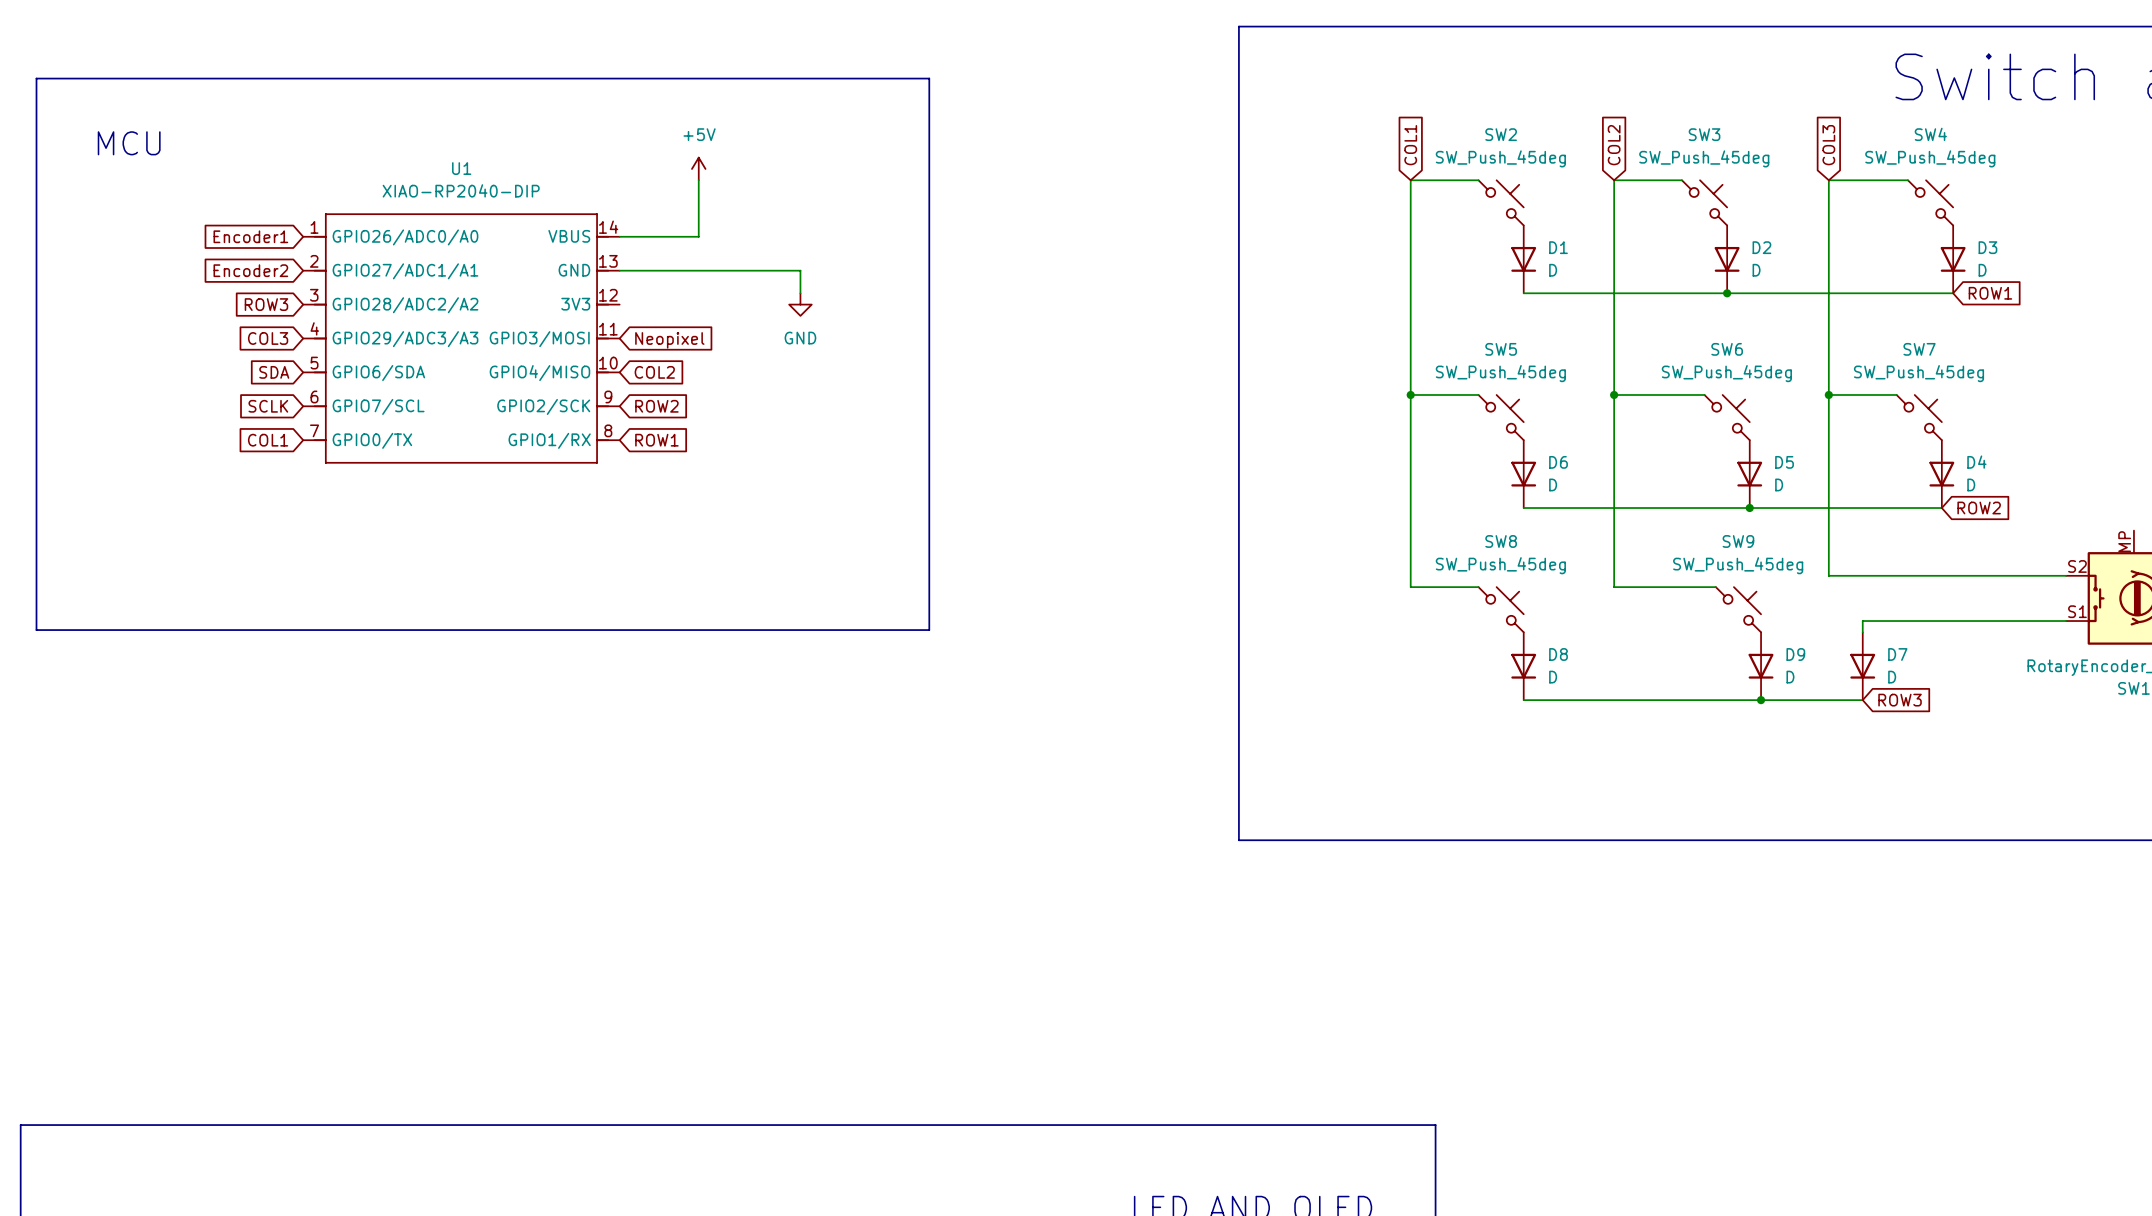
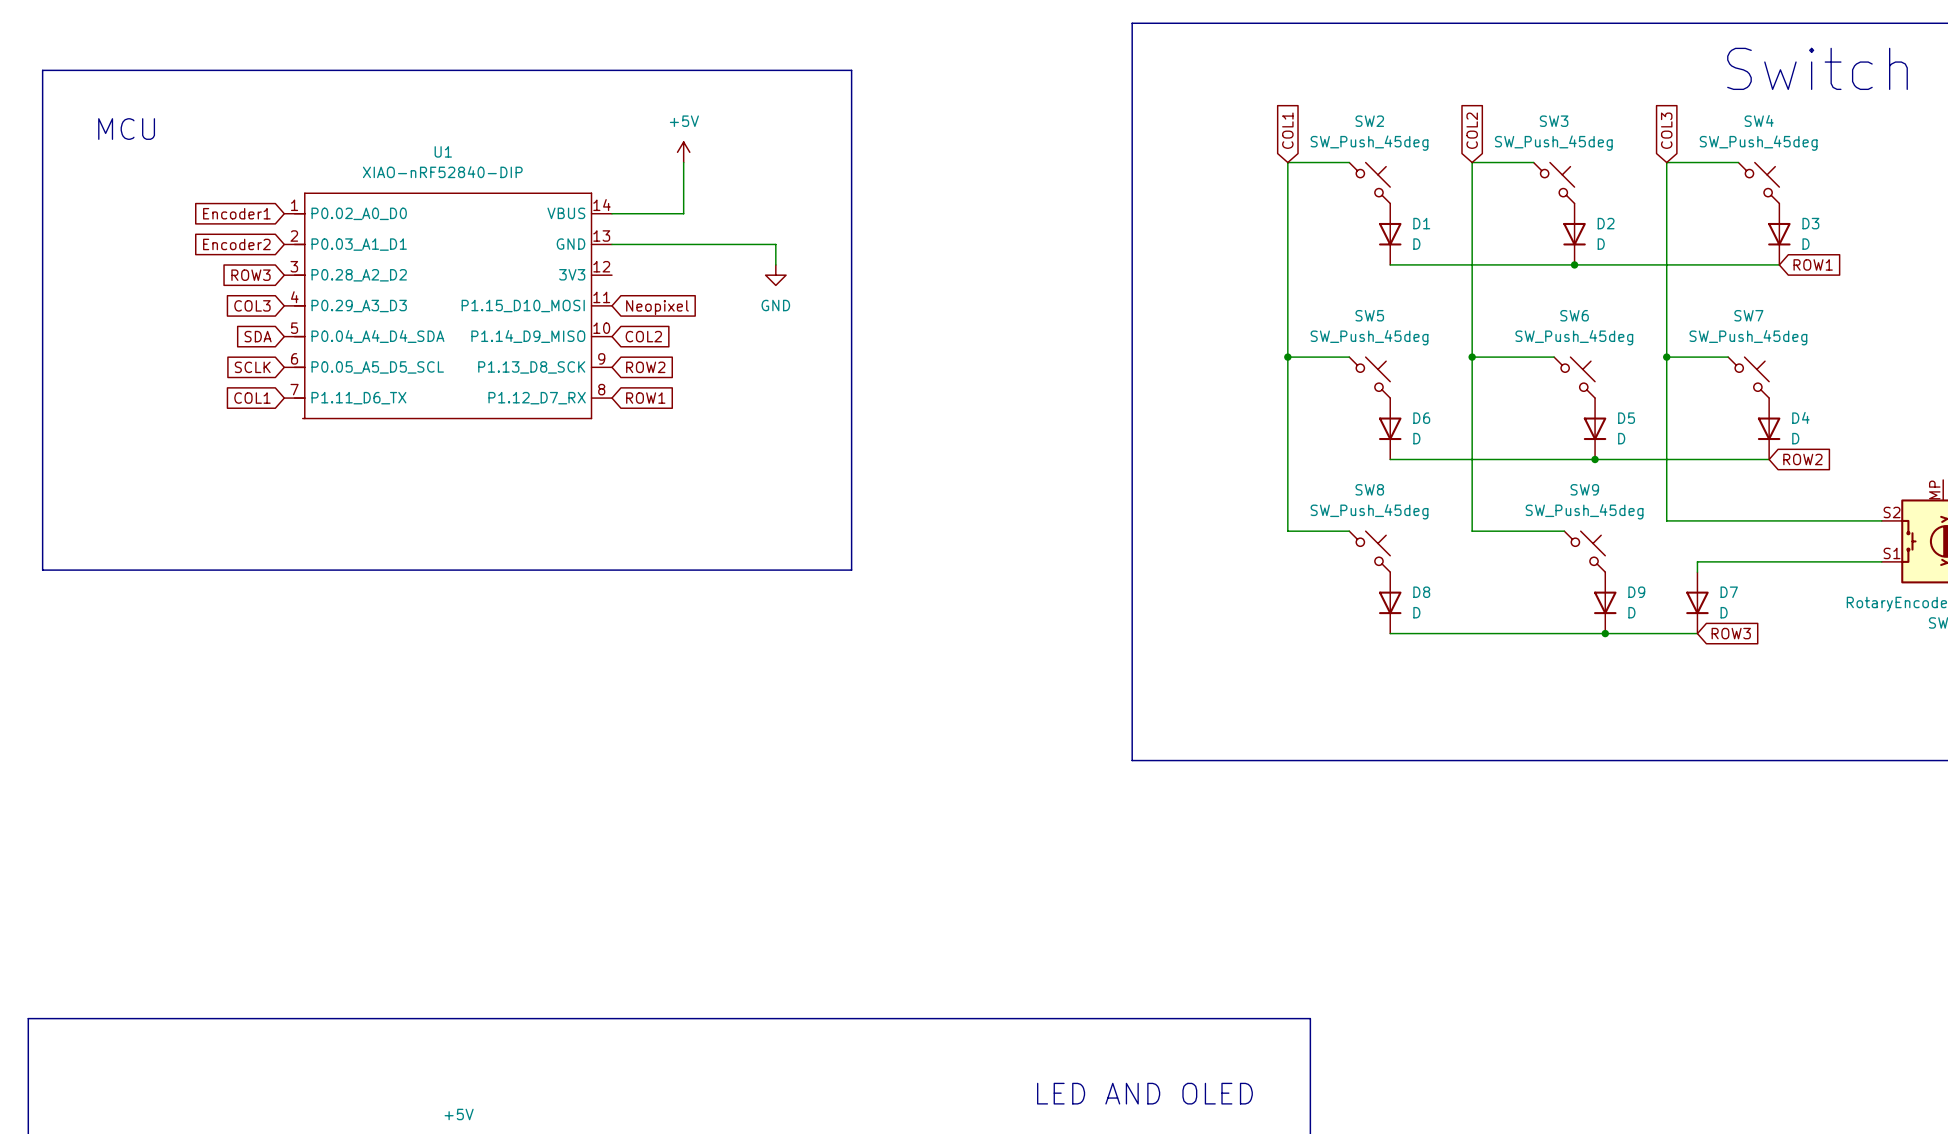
power symbol position: +5V (698, 168) -> +5V (683, 152)
wire: (698, 180) (698, 236) -> (683, 162) (683, 213) (642, 213)
U1 value: XIAO-RP2040-DIP (461, 190) -> XIAO-nRF52840-DIP (442, 172)
U1 symbol: [303, 213, 620, 464] -> [284, 192, 612, 420]
wire: (800, 270) (800, 293) -> (734, 244) (775, 244) (775, 264)
power symbol position: GND (800, 304) -> GND (775, 275)
global label position: Neopixel (669, 340) -> Neopixel (657, 307)
global label position: COL2 (654, 372) -> COL2 (643, 336)
global label position: ROW2 (656, 406) -> ROW2 (645, 367)
global label position: ROW1 (656, 440) -> ROW1 (645, 398)

